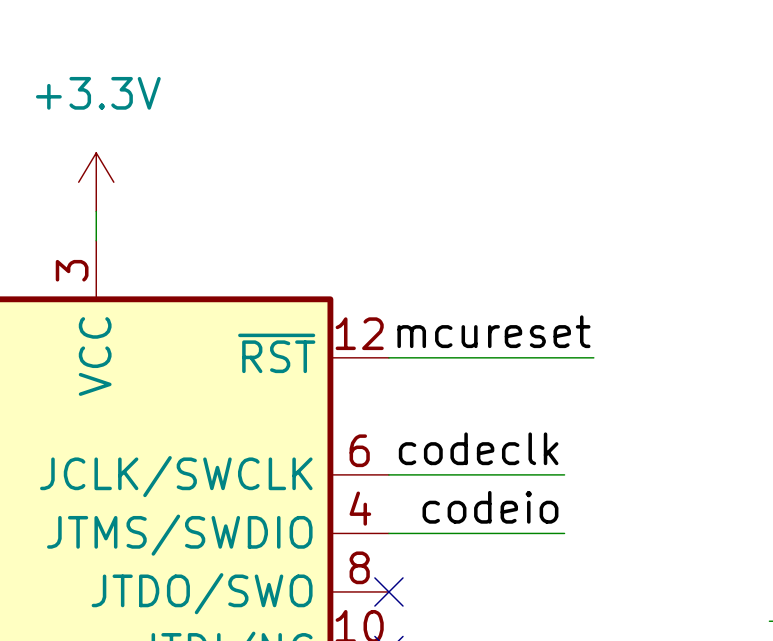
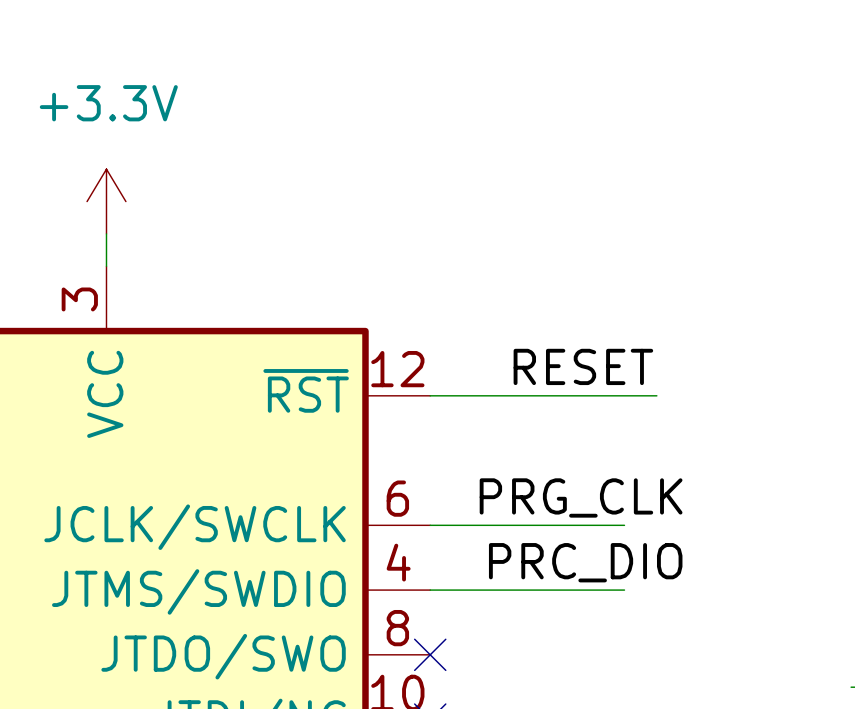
label: mcureset (493, 331) -> RESET (583, 366)
label: codeclk (478, 448) -> none
label: none -> PRG_CLK (581, 497)
label: codeio (490, 507) -> none
label: none -> PRC_DIO (585, 562)

